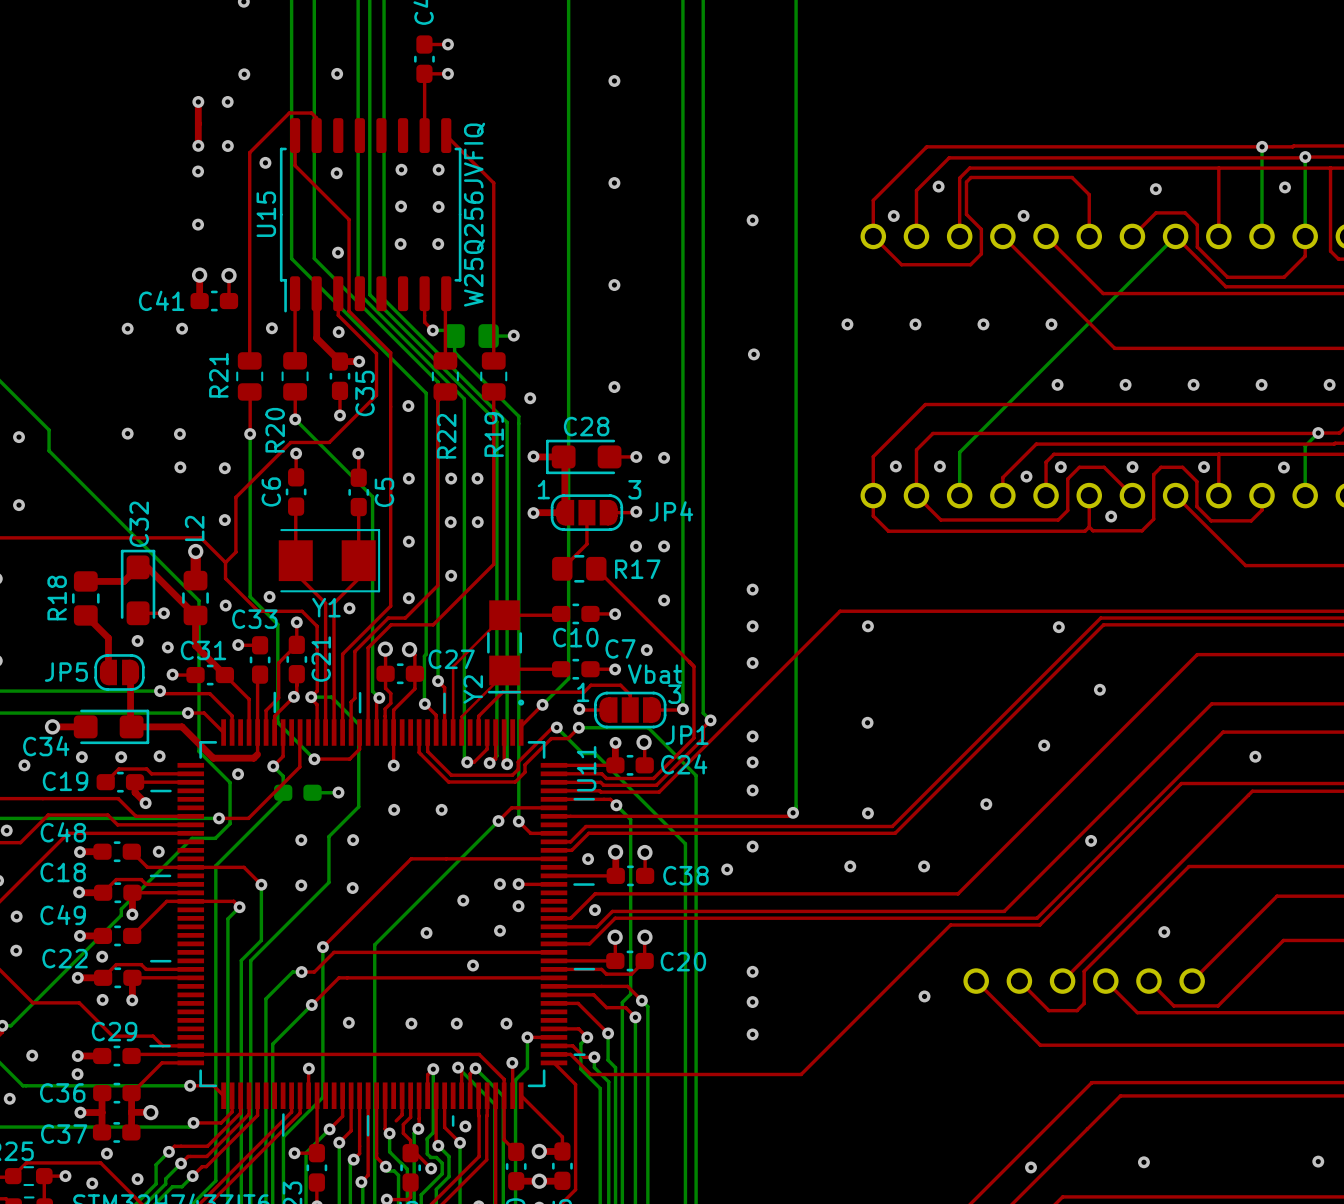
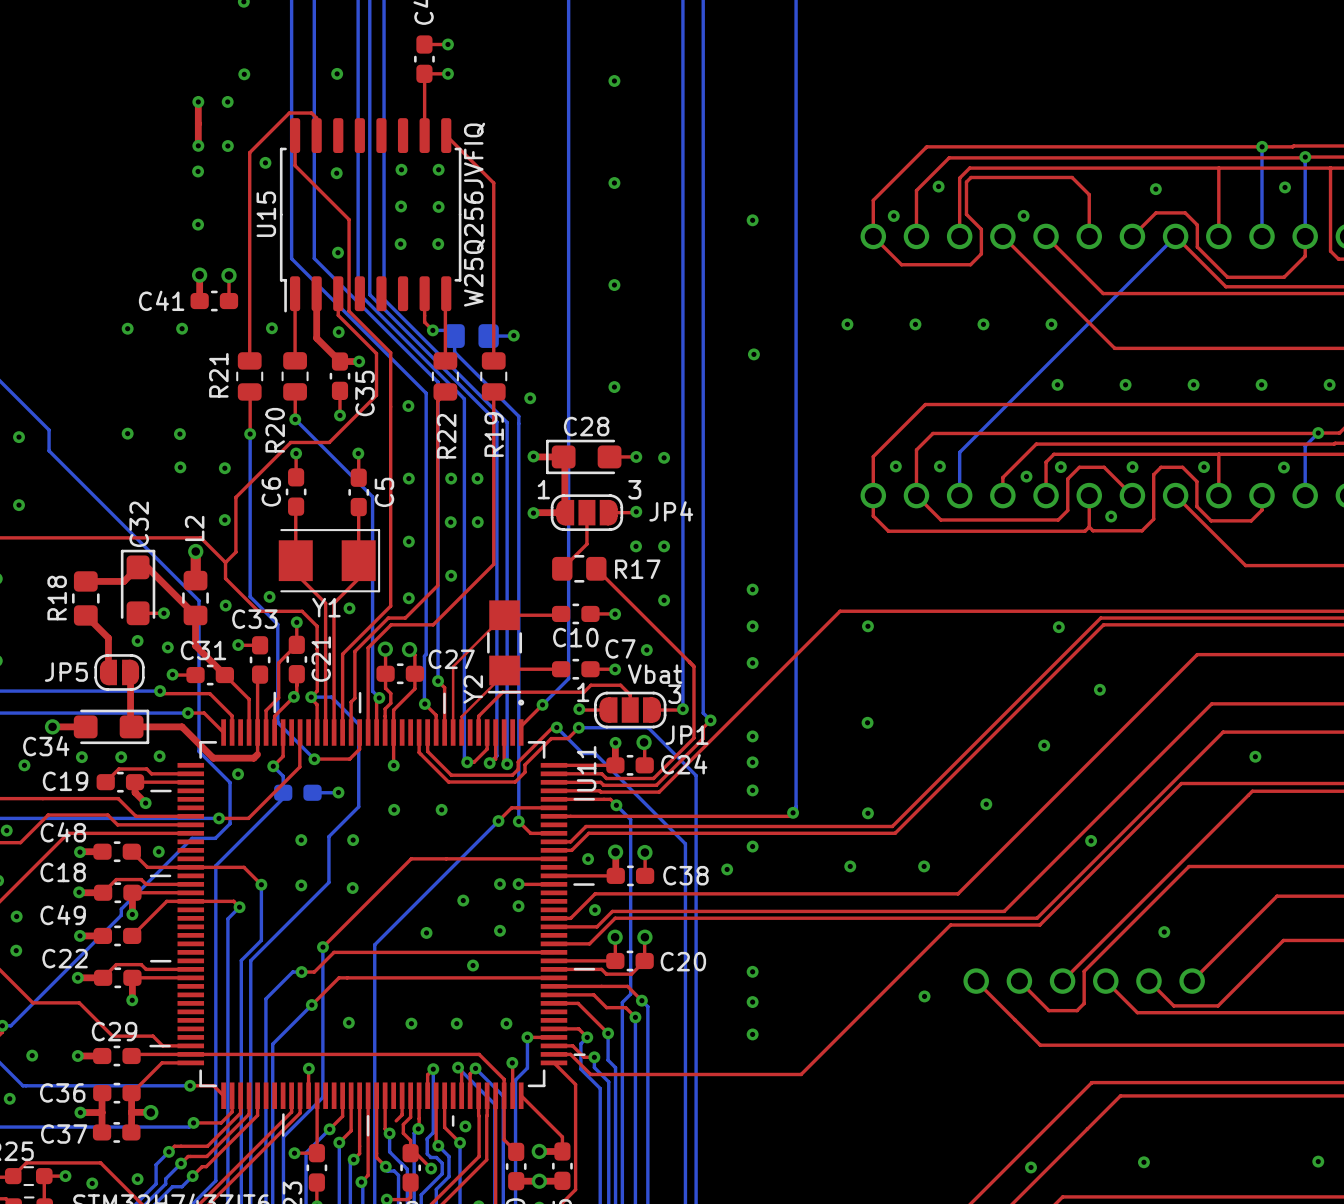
via: (102, 956) -> none
via: (102, 999) -> none
via: (77, 1074) -> none
via: (106, 1153) -> none

